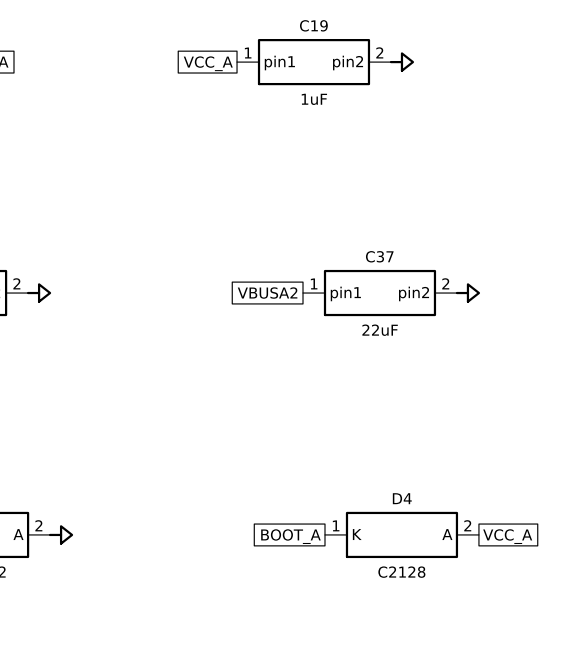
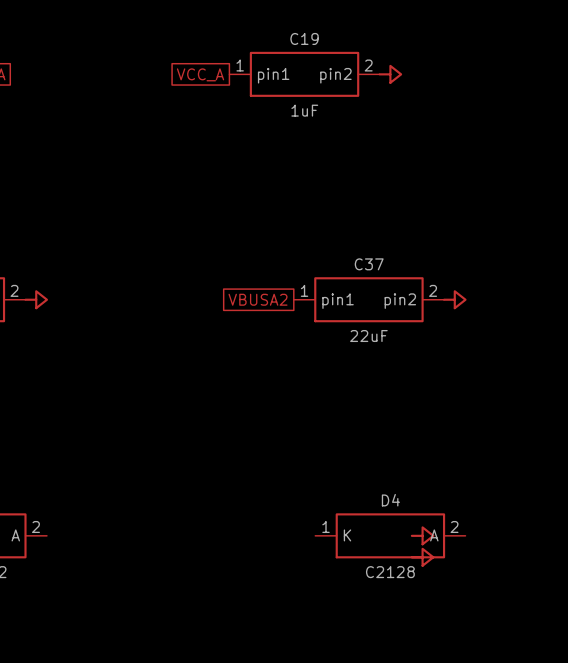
power symbol: (61, 534) -> none
power symbol: none -> (422, 535)
global label: BOOT_A (290, 536) -> none
global label: VCC_A (507, 536) -> none
power symbol: none -> (422, 557)

